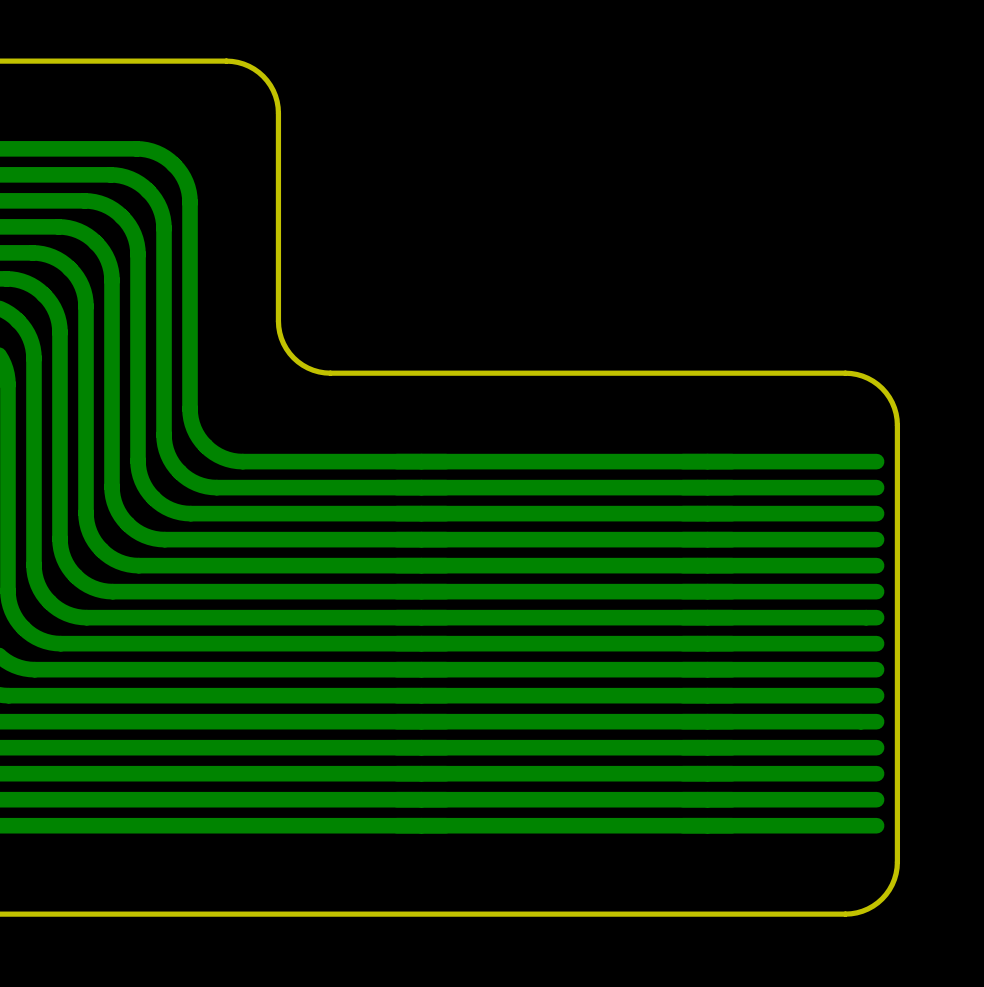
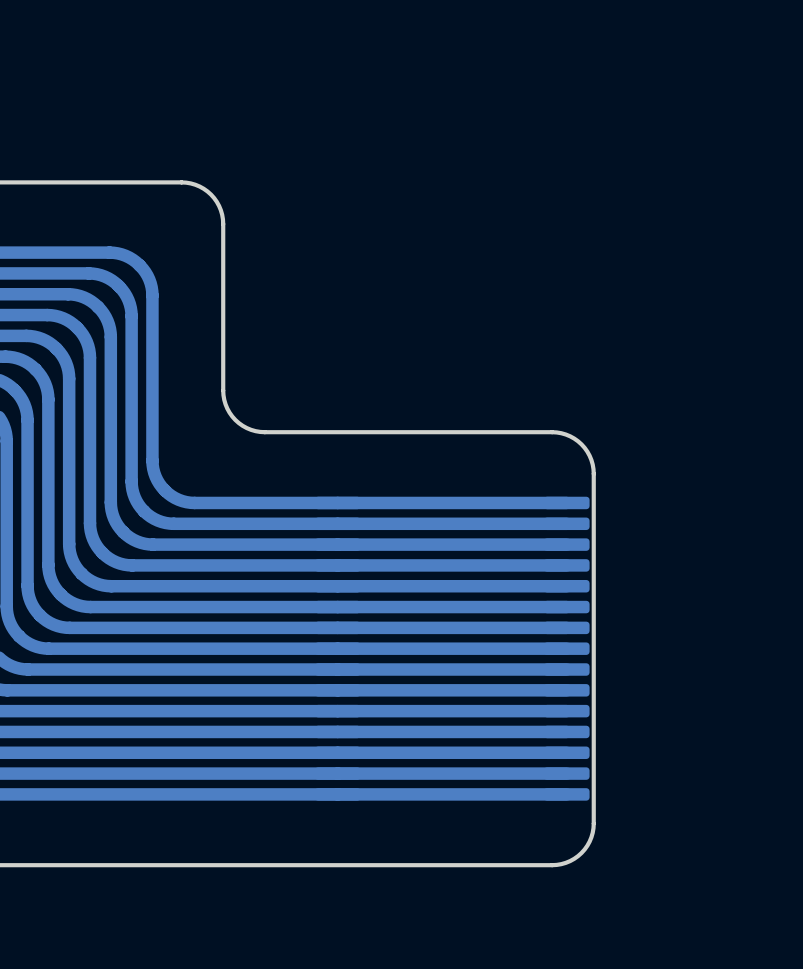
board edge: (689, 373) (856, 374) (873, 381) (886, 392) (894, 408) (897, 425) (897, 862) (892, 884) (877, 902) (862, 911) (851, 913) (689, 914) -> (552, 432) (570, 436) (581, 444) (591, 460) (593, 473) (593, 828) (589, 841) (581, 852) (570, 861) (552, 865)
bottom track: (707, 461) (876, 461) -> none
bottom track: (707, 487) (876, 487) -> none
bottom track: (707, 513) (876, 513) -> none
bottom track: (707, 539) (876, 539) -> none
bottom track: (707, 565) (876, 565) -> none
bottom track: (707, 591) (876, 591) -> none
bottom track: (707, 617) (876, 617) -> none
bottom track: (707, 643) (876, 643) -> none
bottom track: (707, 669) (876, 669) -> none
bottom track: (707, 695) (876, 695) -> none
bottom track: (707, 721) (876, 721) -> none
bottom track: (707, 747) (876, 747) -> none
bottom track: (707, 773) (876, 773) -> none
bottom track: (707, 799) (876, 799) -> none
bottom track: (707, 825) (876, 825) -> none

